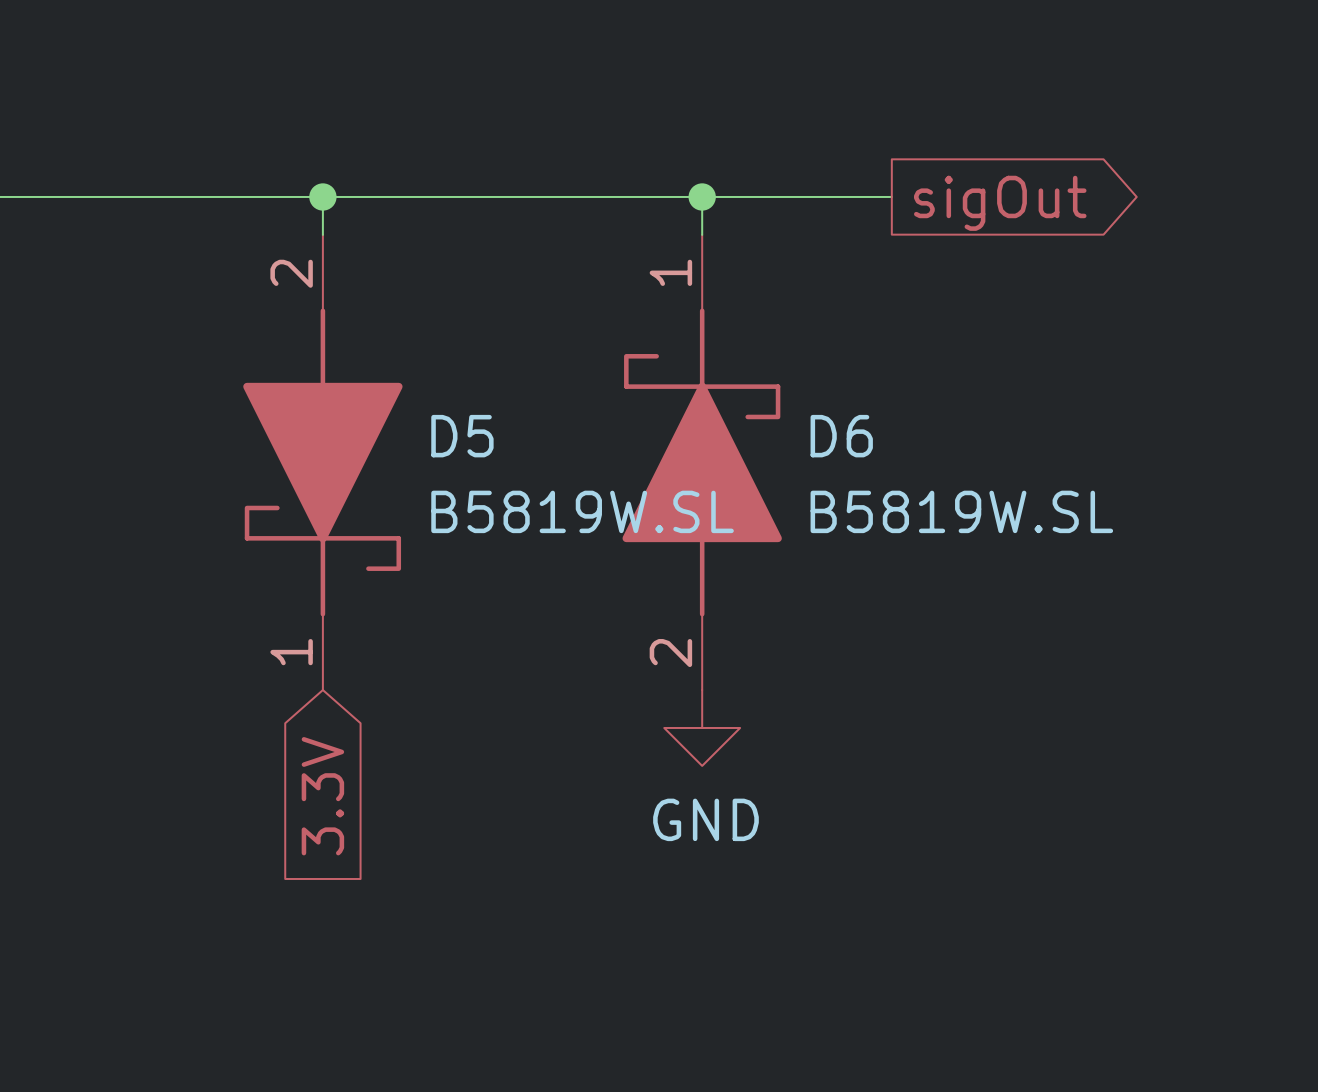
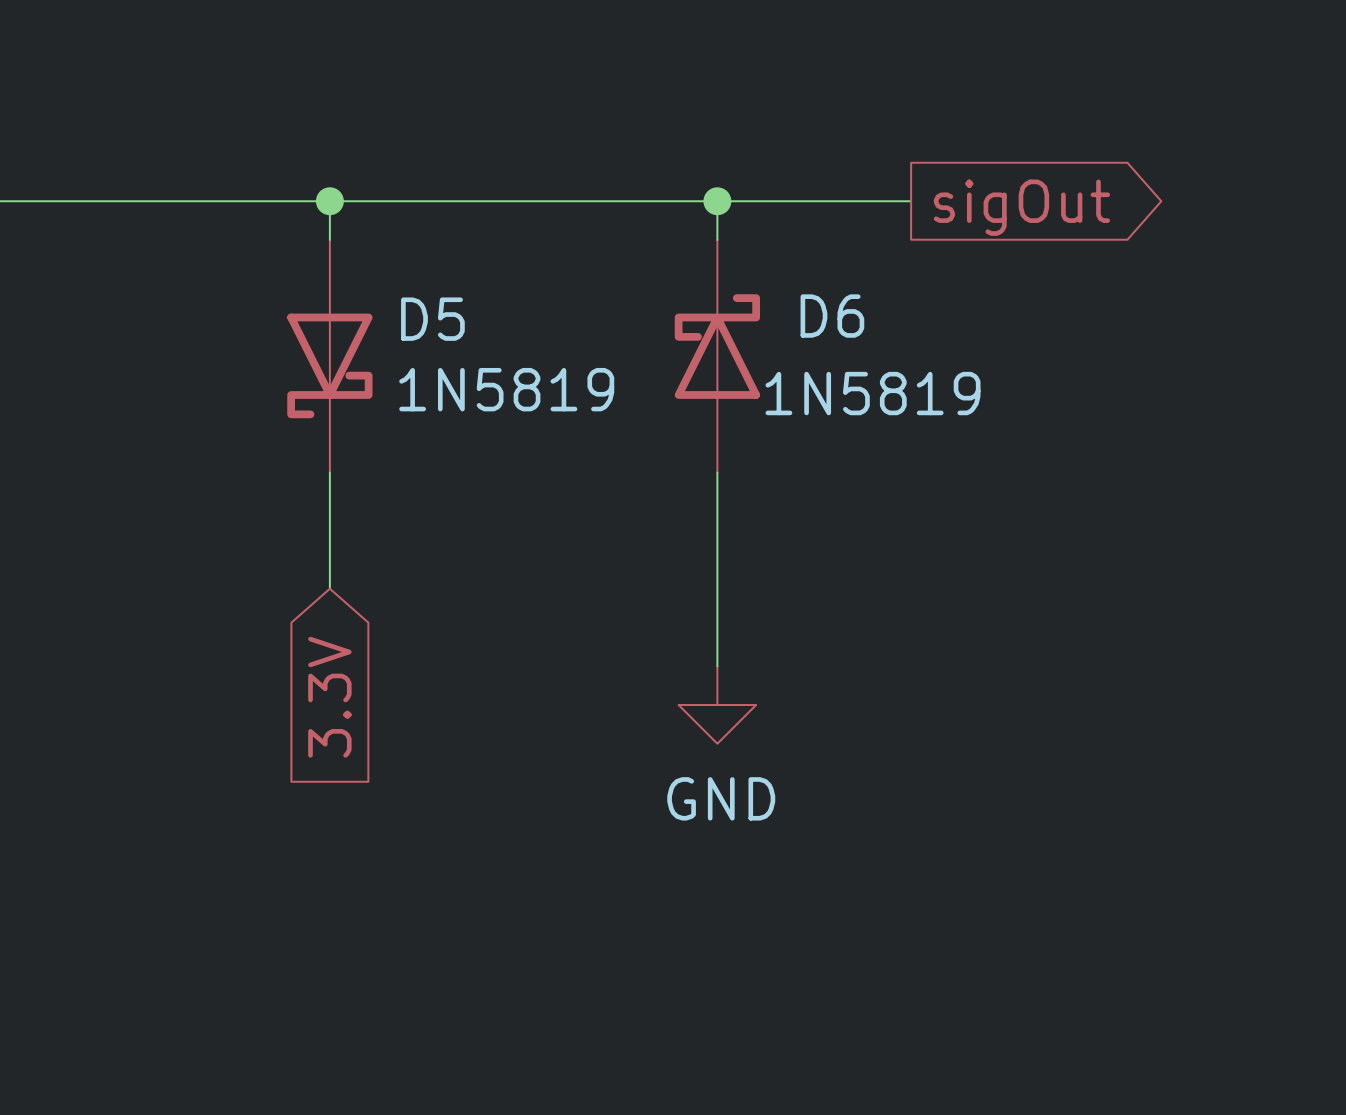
D5 symbol: [243, 234, 403, 691] -> [287, 239, 373, 473]
D6 symbol: [622, 234, 782, 691] -> [674, 239, 761, 473]
D5 value: B5819W.SL (582, 511) -> 1N5819 (506, 389)
D6 value: B5819W.SL (961, 511) -> 1N5819 (873, 393)
power symbol position: GND (702, 727) -> GND (717, 704)
global label position: 3.3V (322, 796) -> 3.3V (329, 697)

